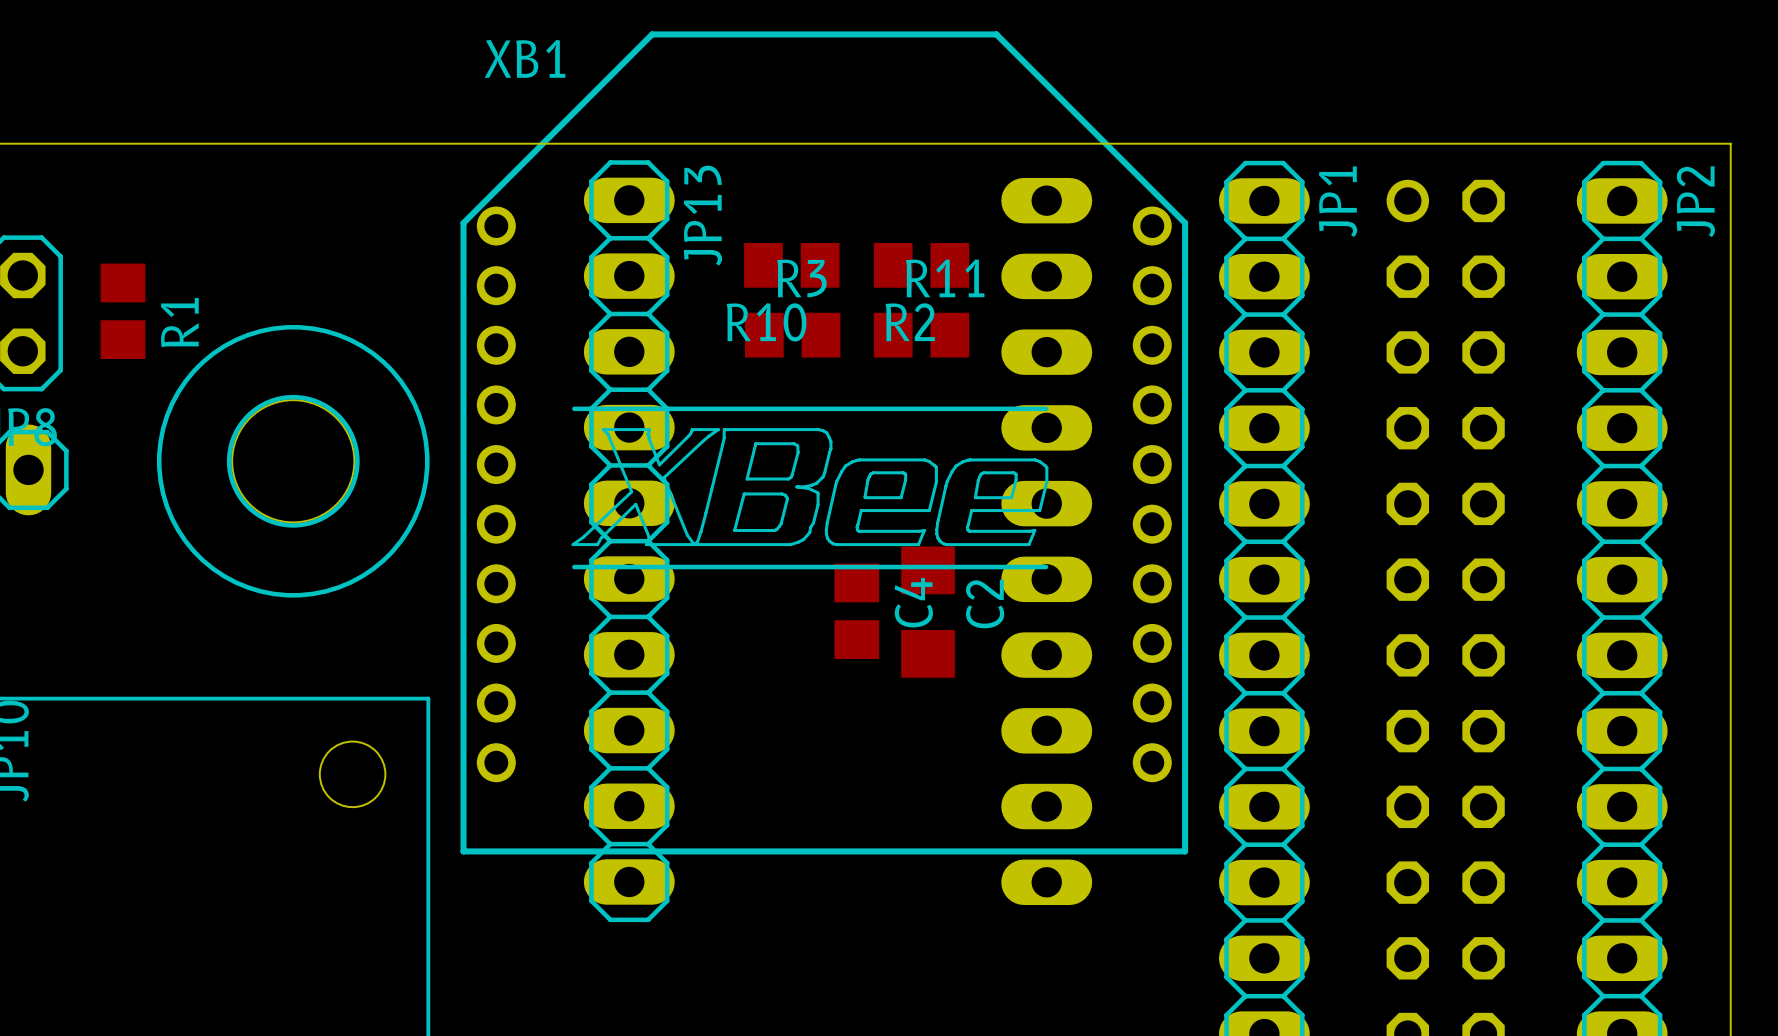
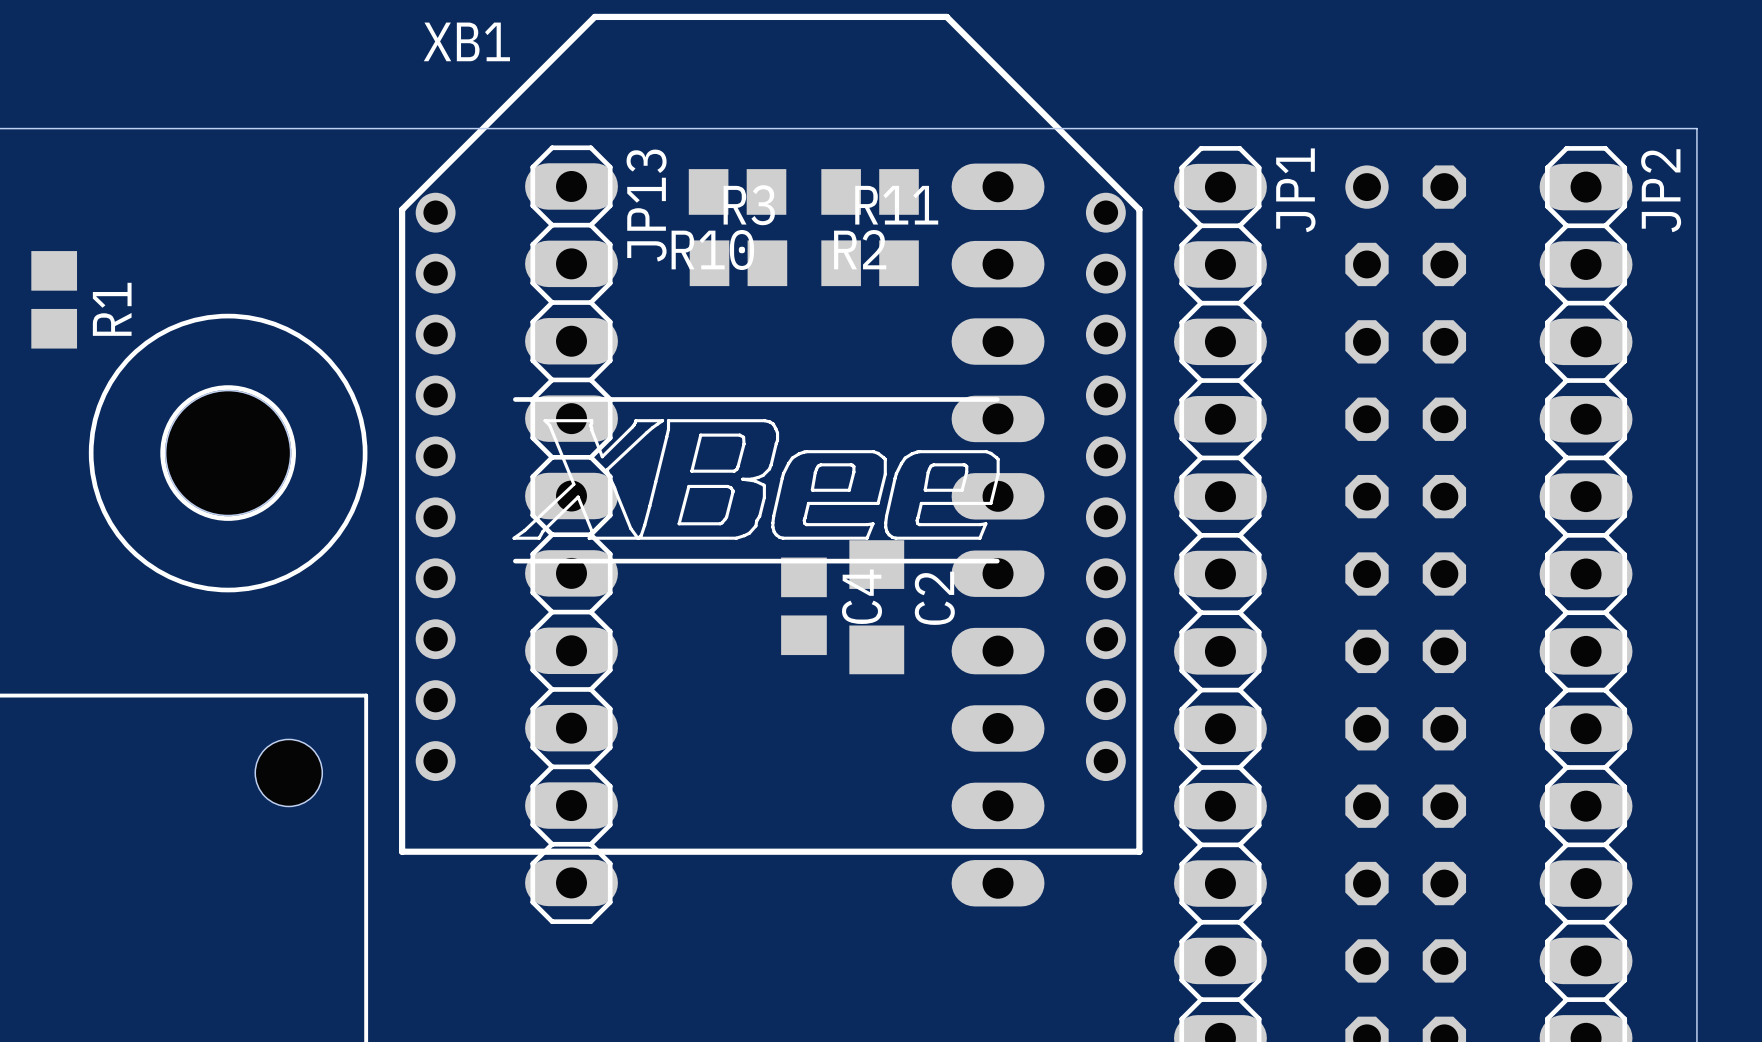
R10 position: (791, 265) -> (737, 191)
R2 position: (921, 265) -> (870, 191)
R3 position: (792, 335) -> (738, 263)
R11 position: (921, 335) -> (870, 263)

